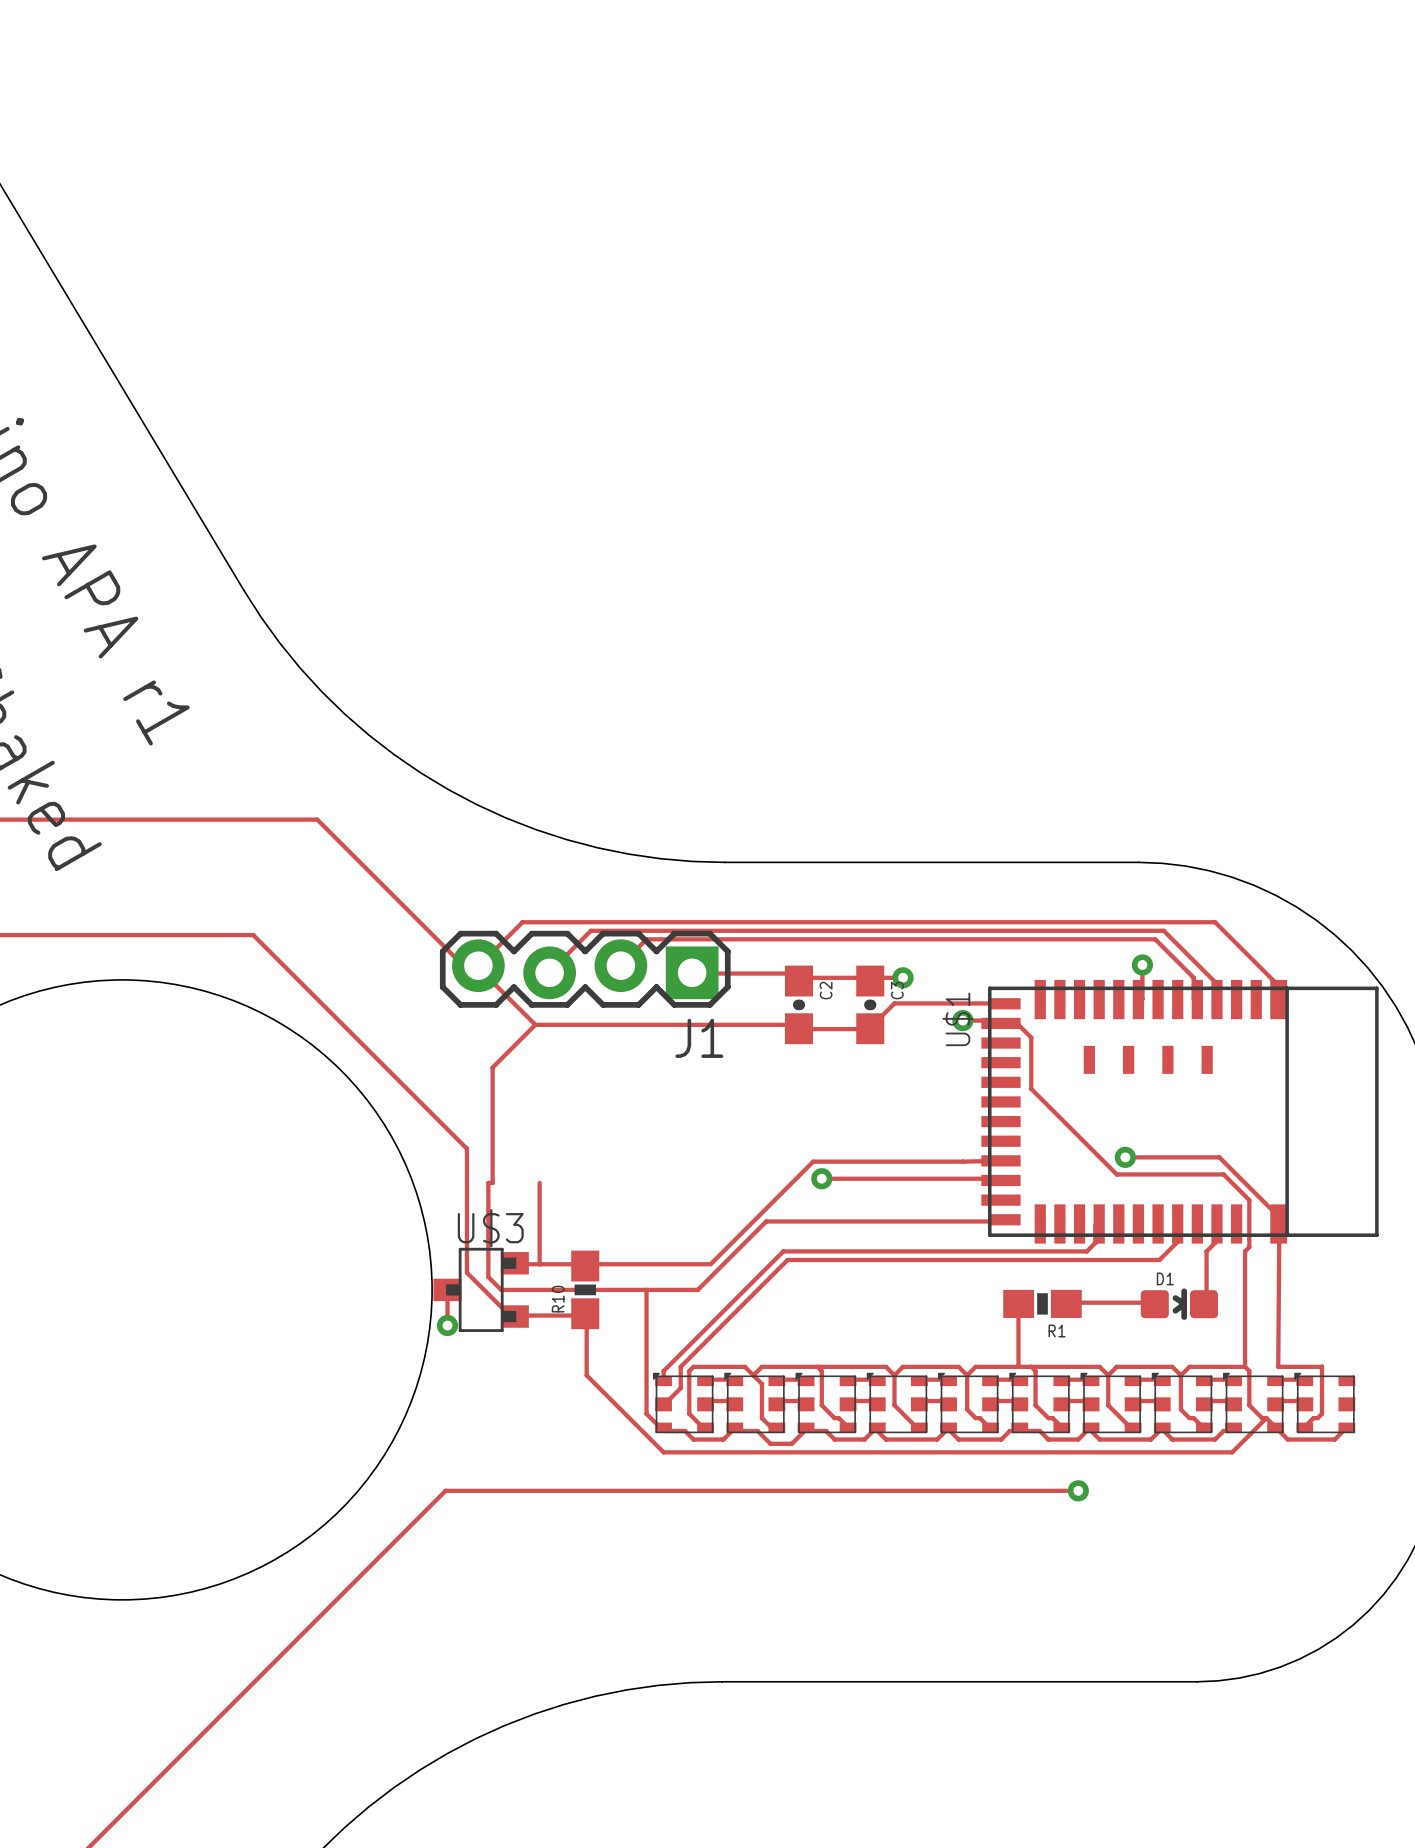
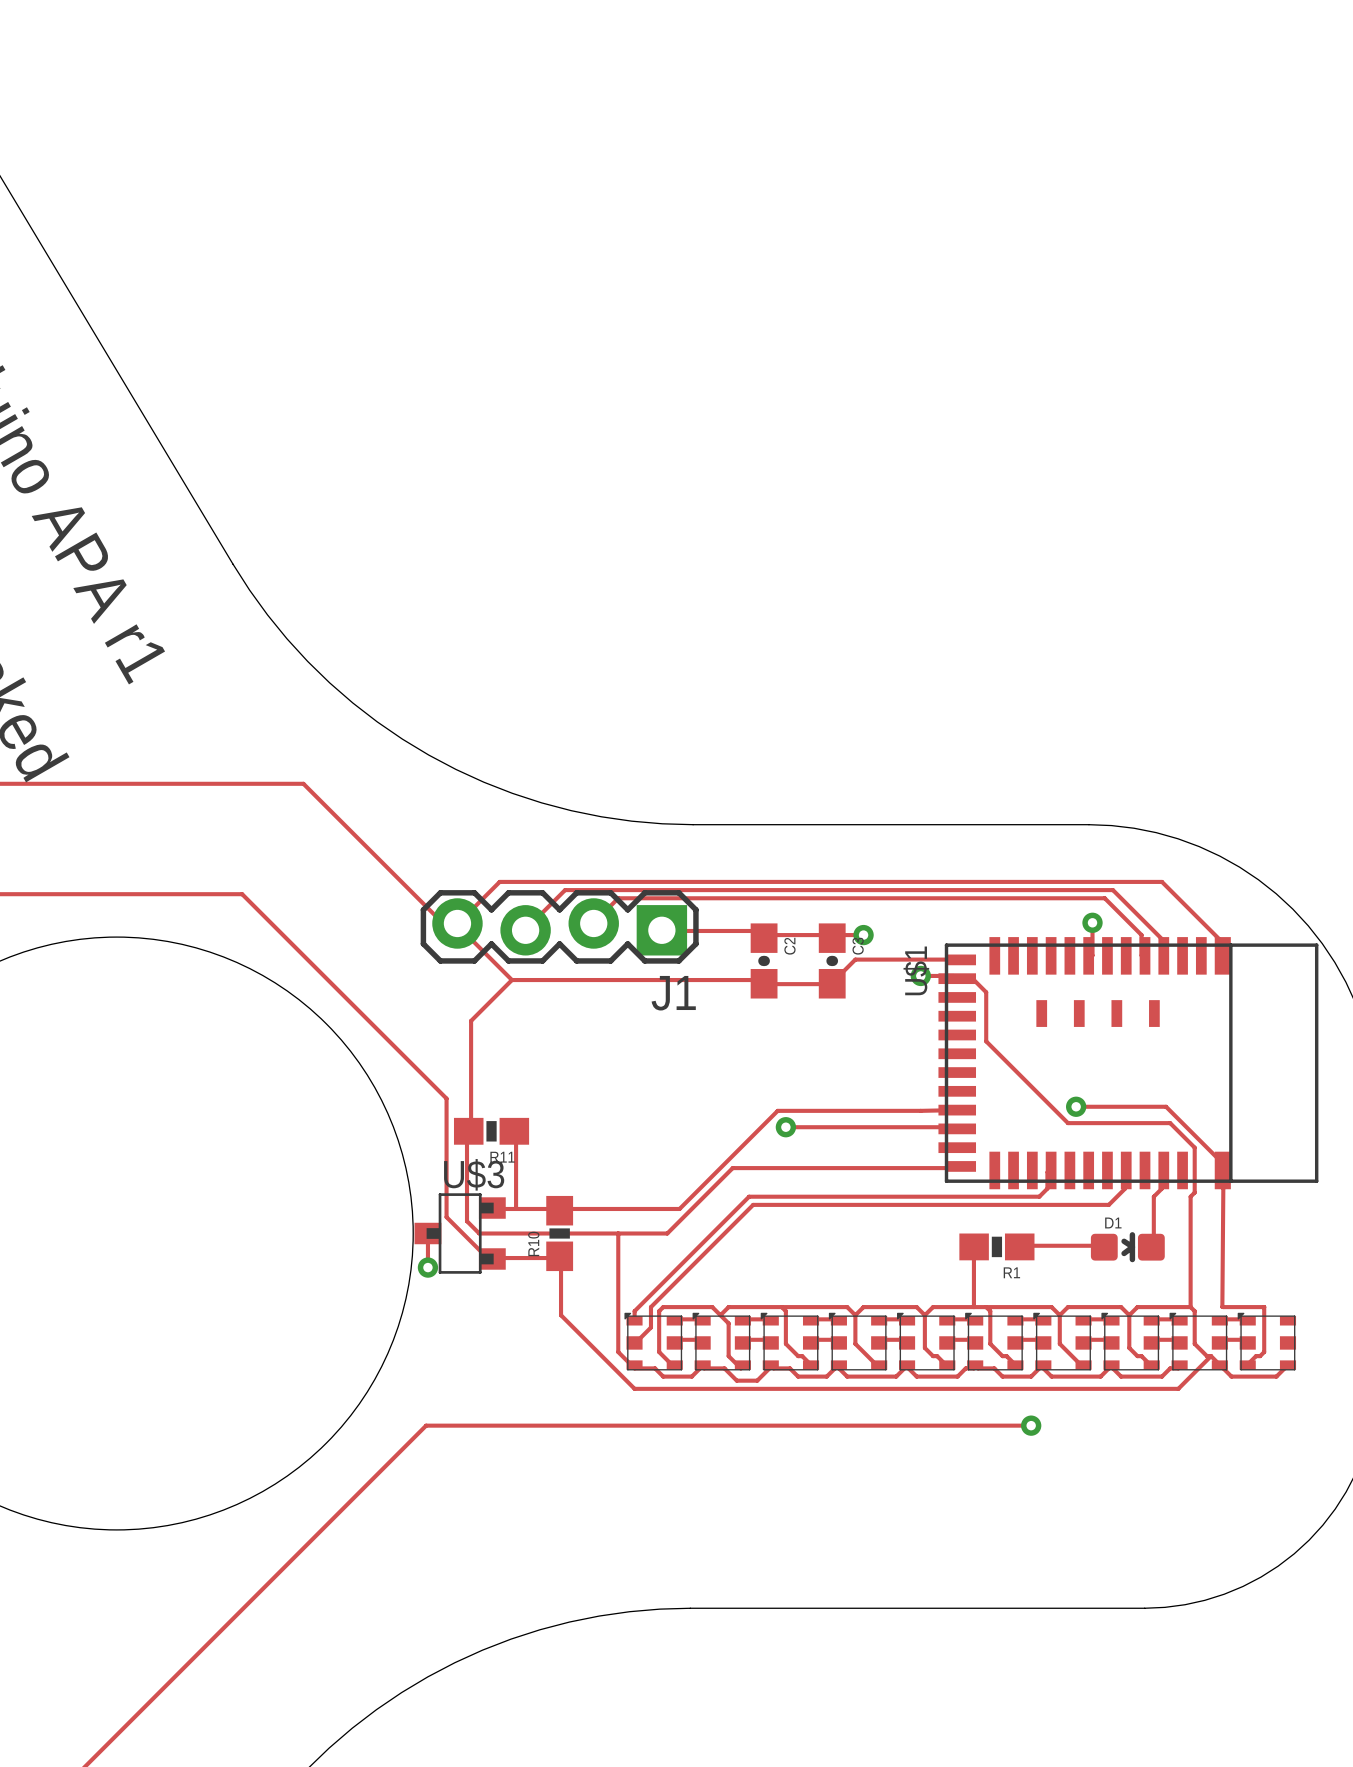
R11: none -> (491, 1131)

